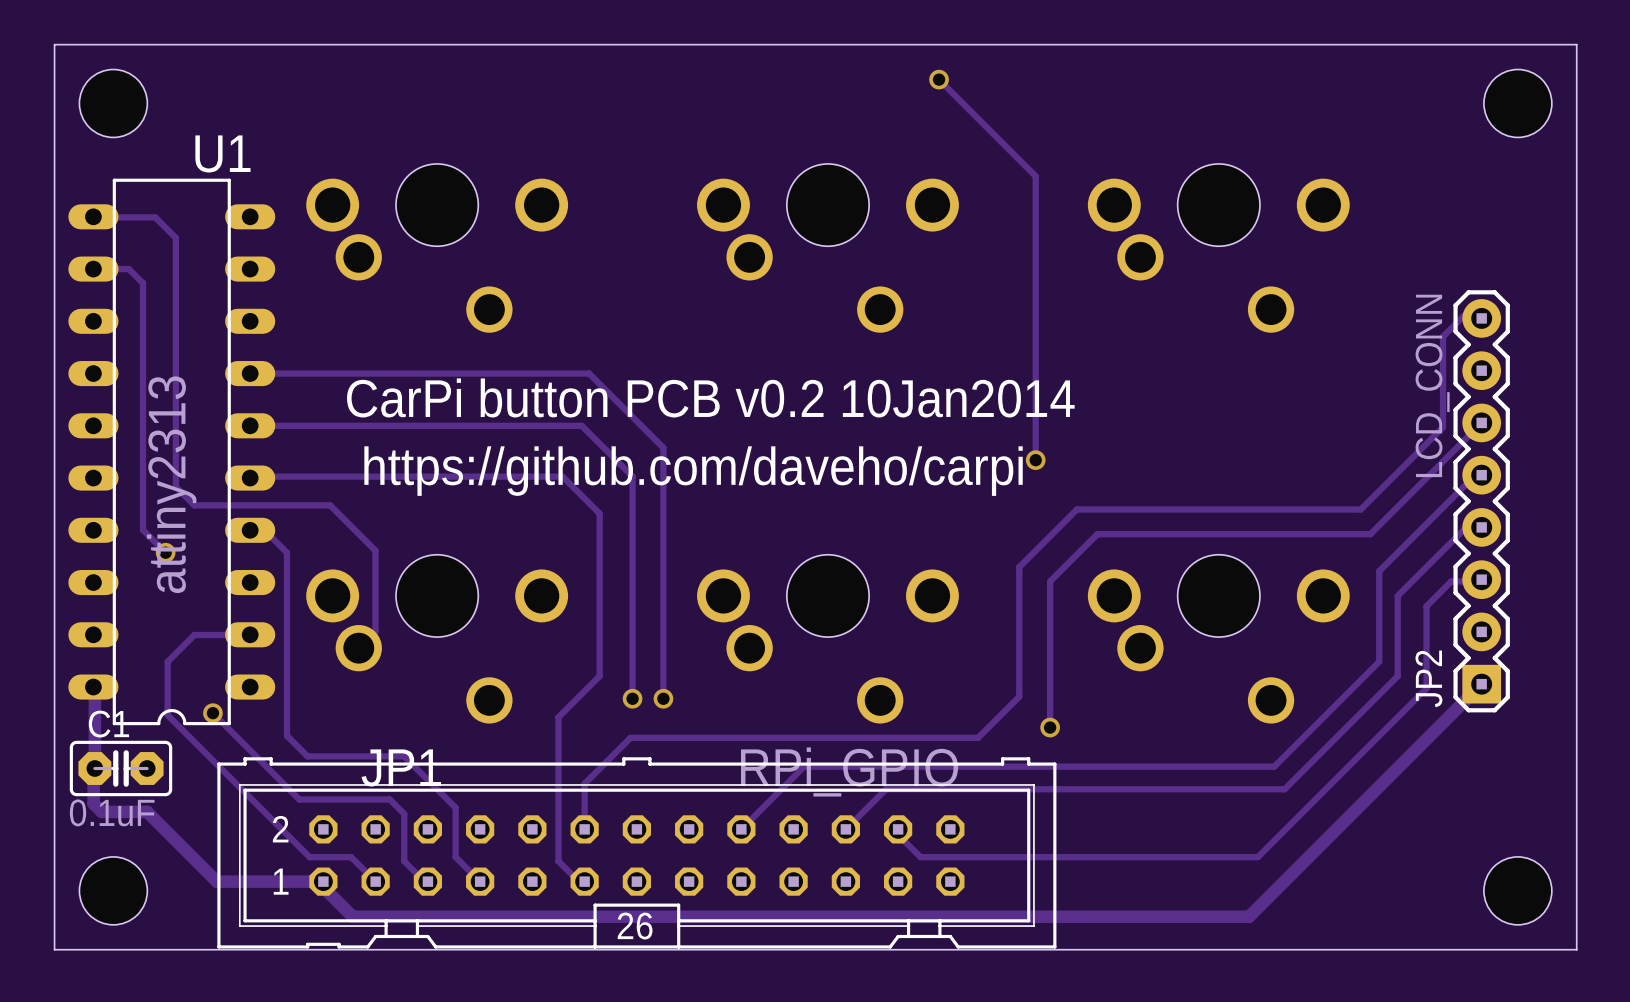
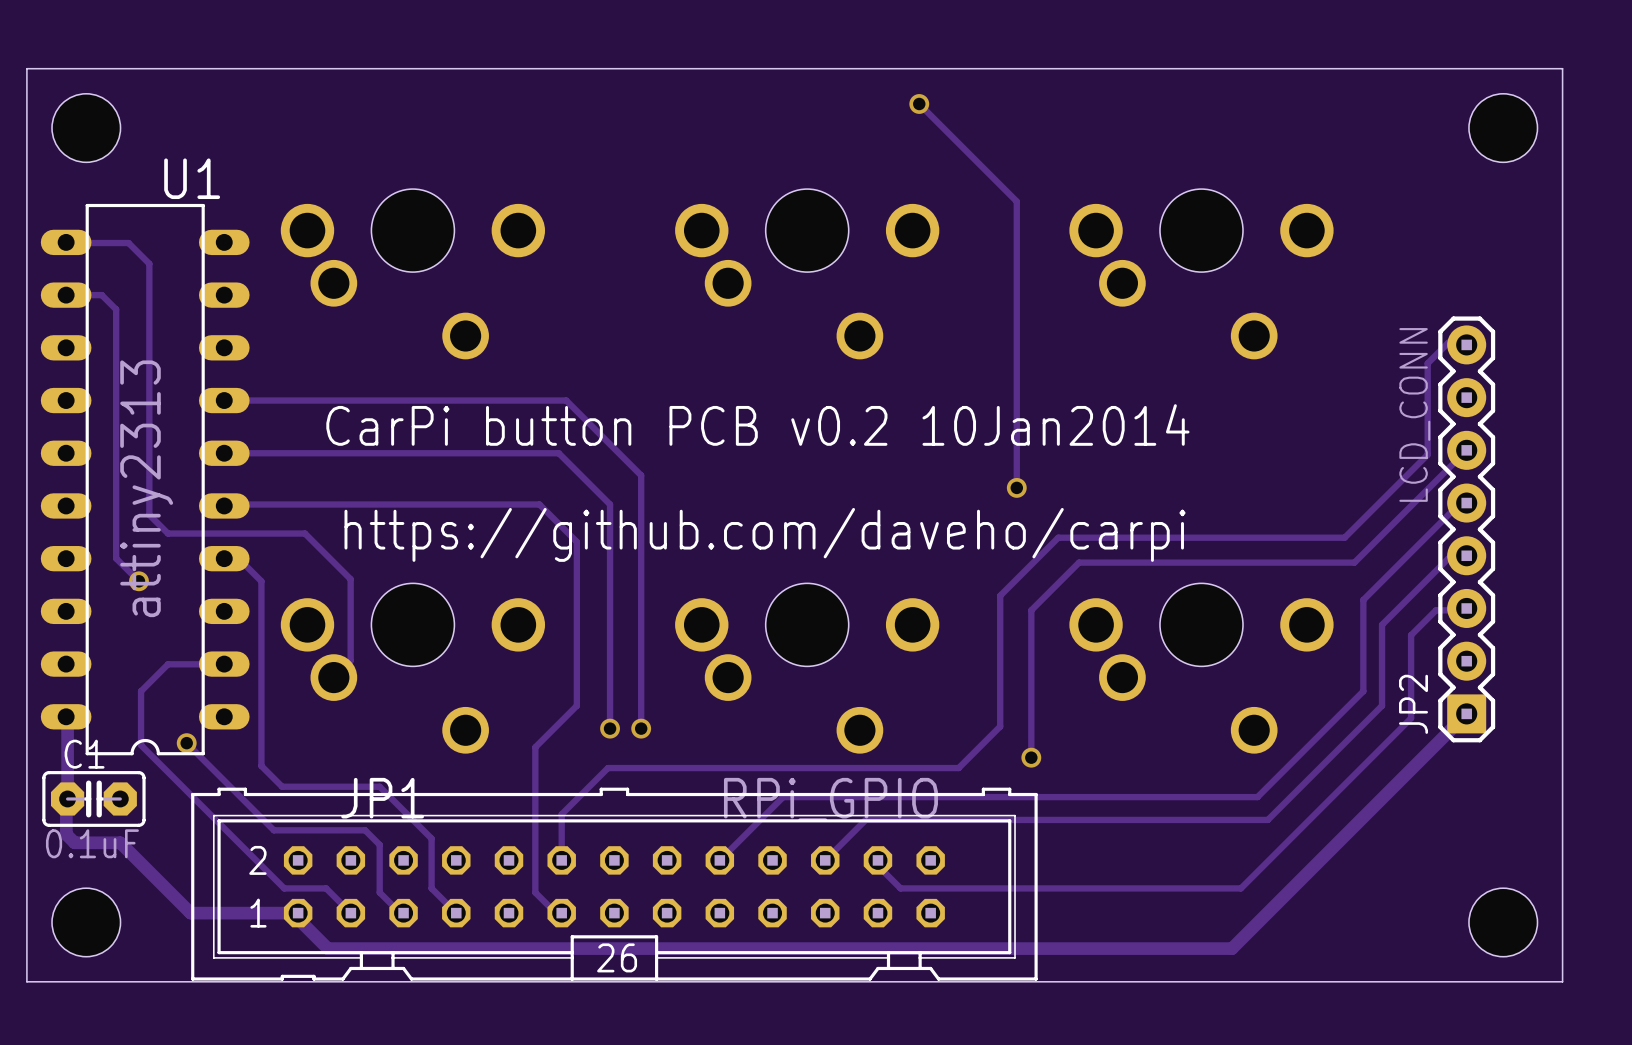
text position: https://github.com/daveho/carpi (693, 471) -> https://github.com/daveho/carpi (765, 534)

